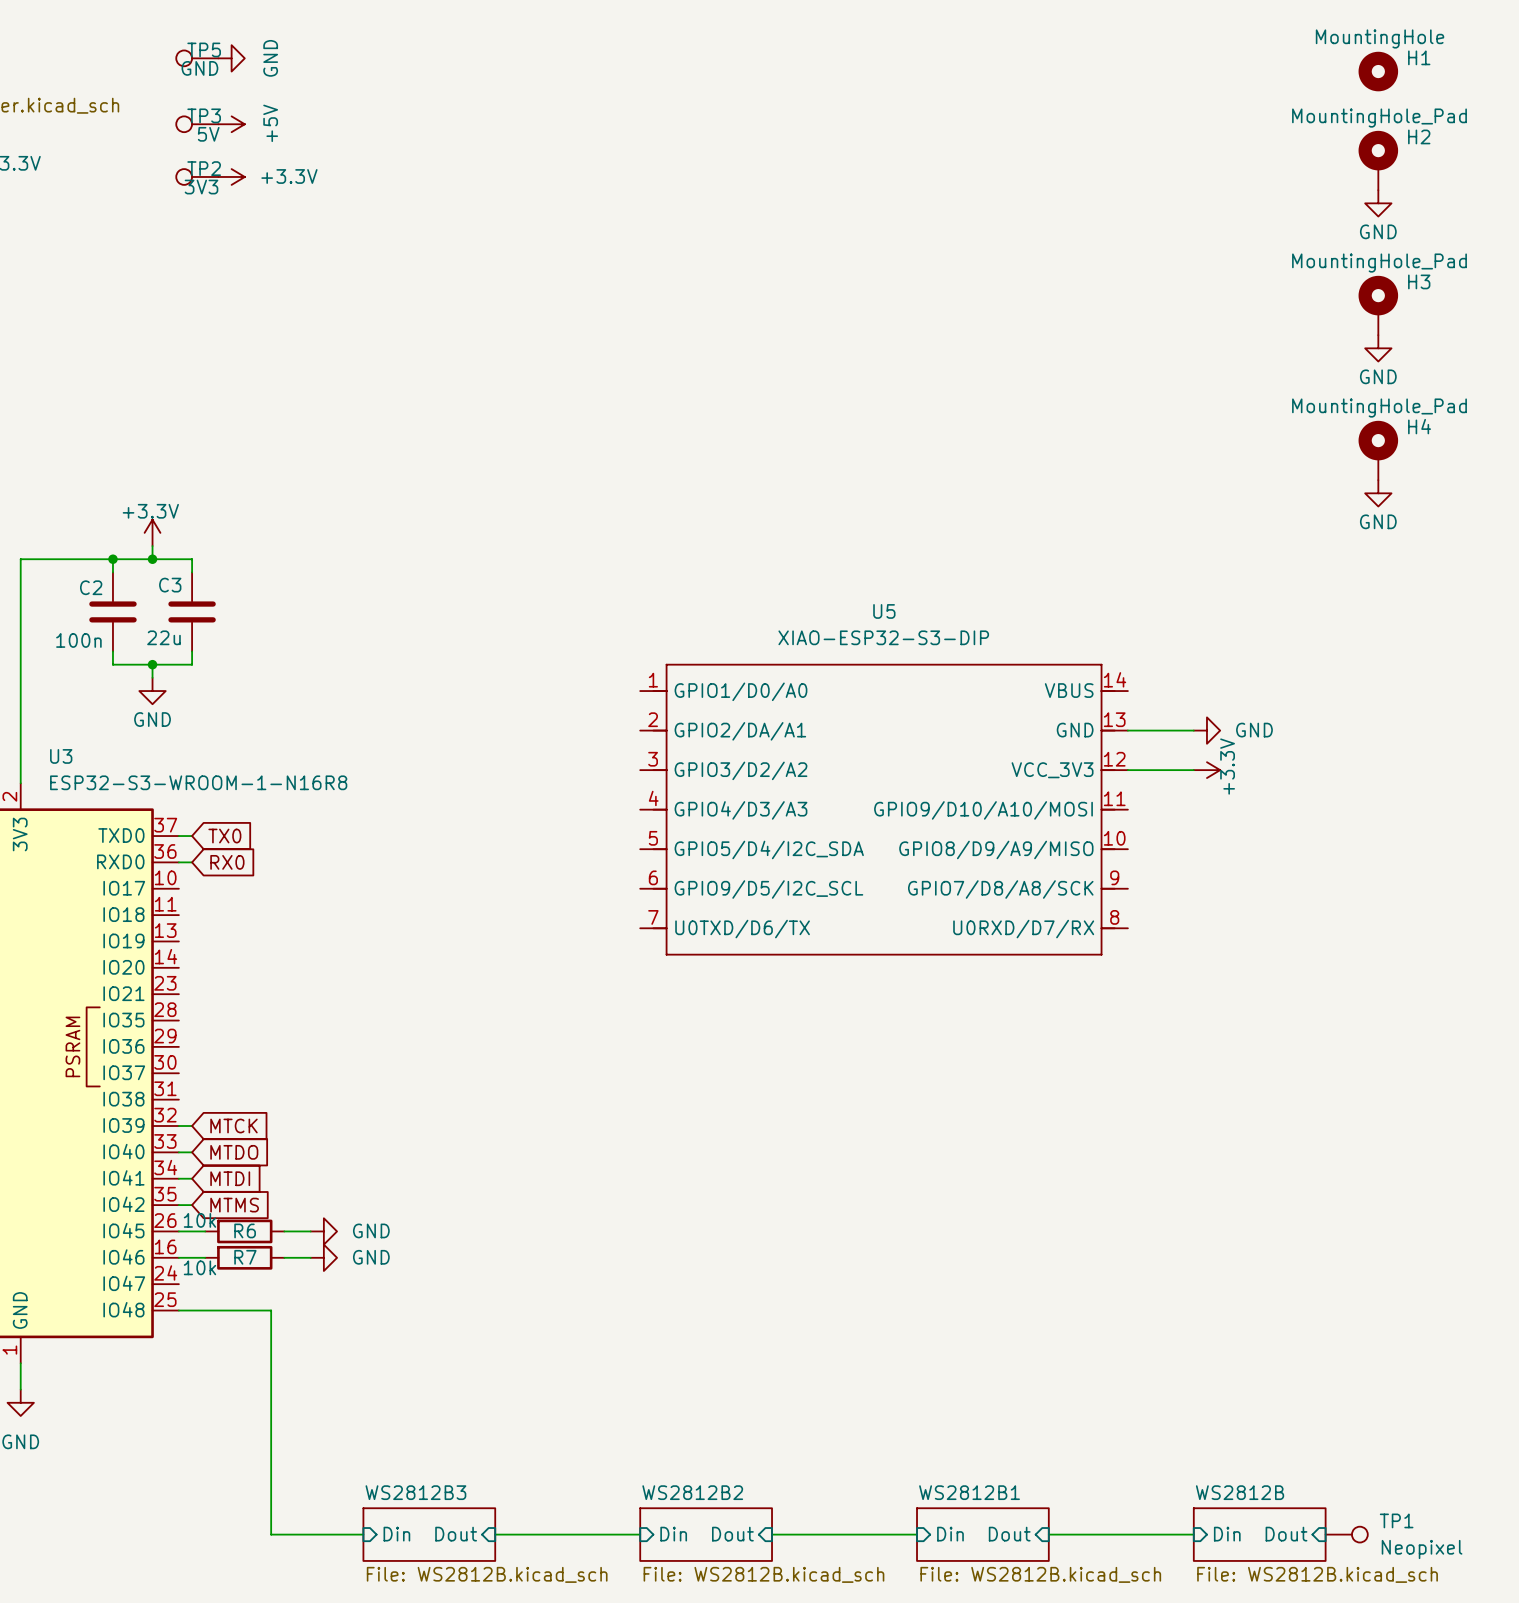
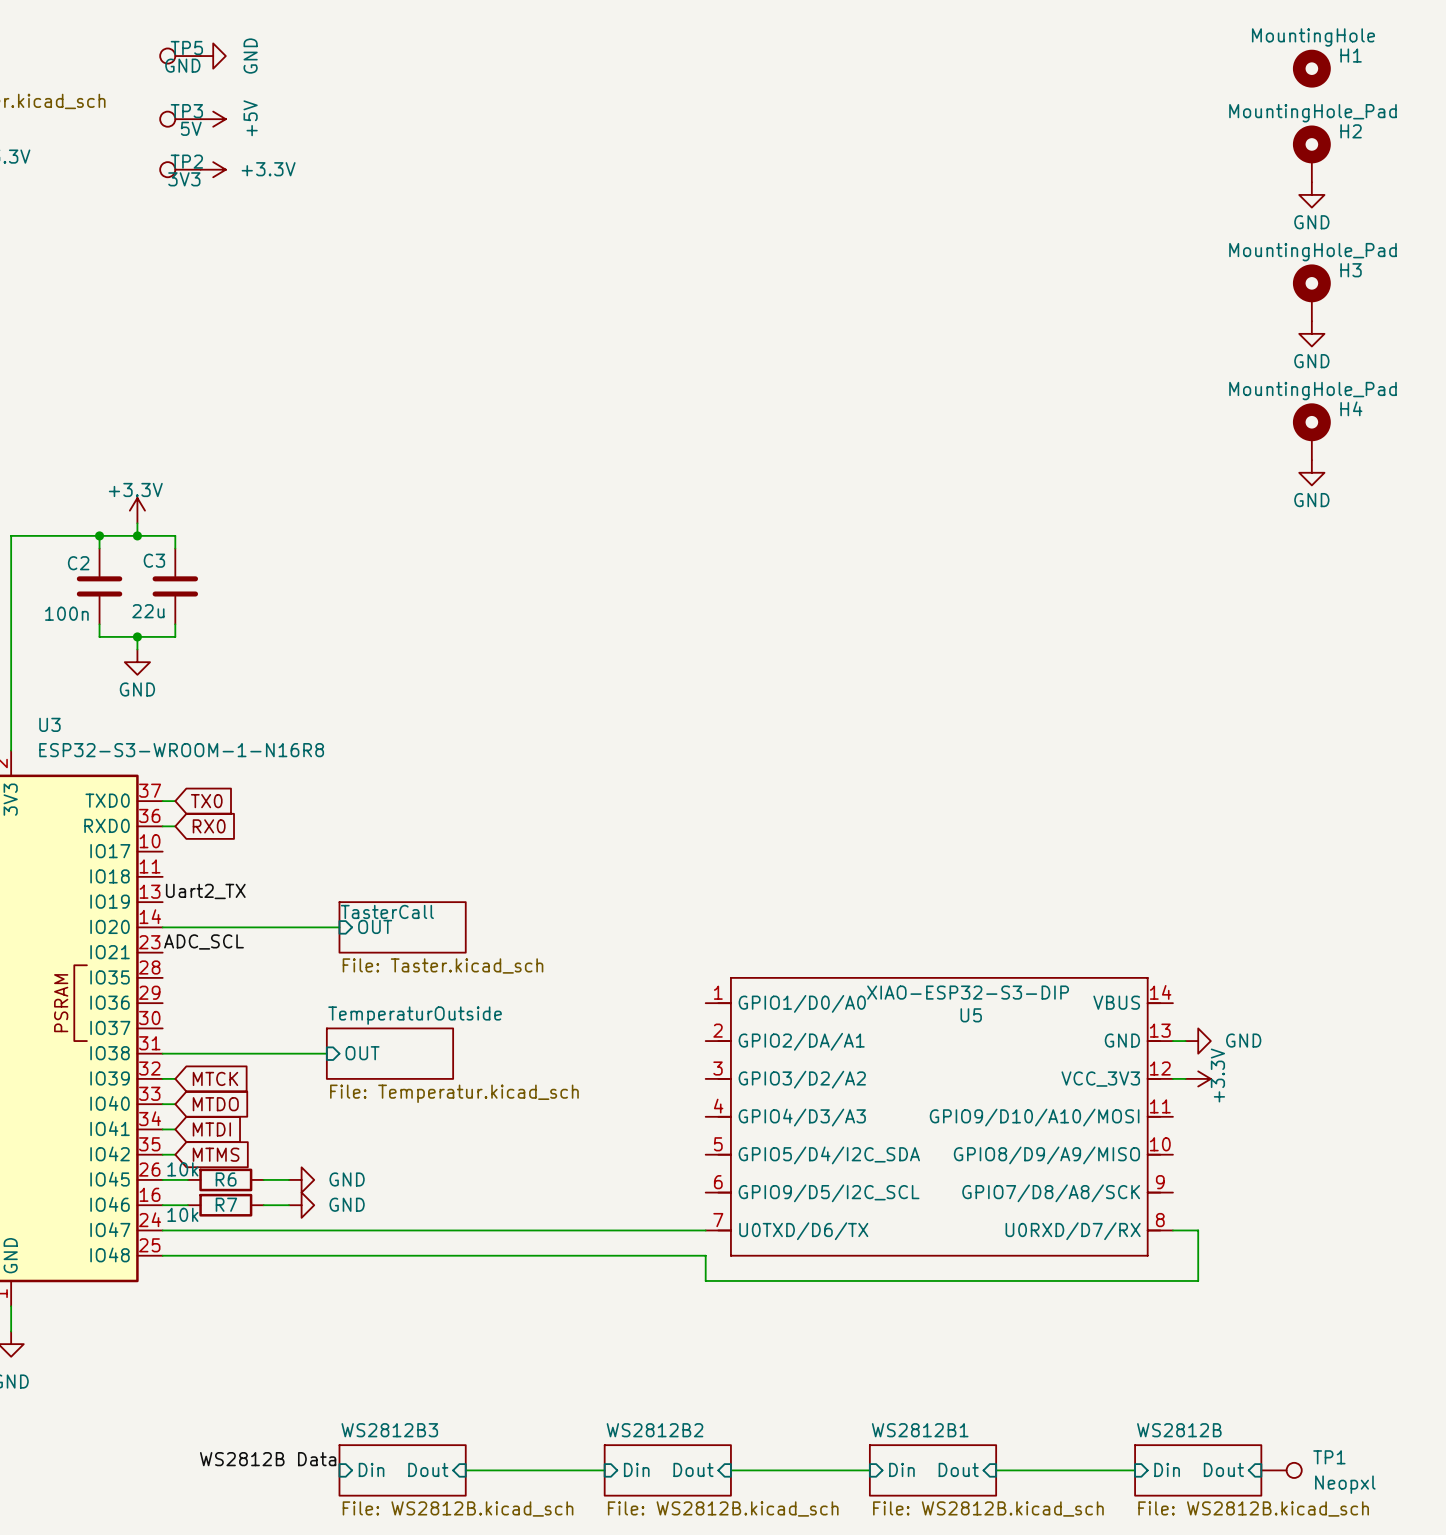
U5 name position: U5 (884, 611) -> U5 (971, 1015)
U5 value position: XIAO-ESP32-S3-DIP (883, 637) -> XIAO-ESP32-S3-DIP (968, 992)
wire: (1127, 730) (1193, 730) -> none
power symbol: GND (1206, 730) -> none
wire: (1127, 770) (1193, 770) -> none
power symbol: +3.3V (1206, 770) -> none
U5 position: (884, 809) -> (939, 1116)
label: none -> Uart2_TX (205, 891)
wire: none -> (162, 927) (339, 927)
sheet pin: none -> OUT (375, 926)
sheet TasterCall: none -> File: Taster.kicad_sch (402, 927)
label: none -> ADC_SCL (203, 941)
wire: none -> (1172, 1041) (1185, 1041)
power symbol: none -> GND (1198, 1041)
wire: none -> (162, 1053) (326, 1053)
sheet pin: none -> OUT (362, 1053)
sheet TemperaturOutside: none -> File: Temperatur.kicad_sch (389, 1053)
wire: none -> (1172, 1078) (1185, 1078)
power symbol: none -> +3.3V (1198, 1078)
wire: none -> (162, 1230) (705, 1230)
wire: (271, 1310) (271, 1534) (363, 1534) -> (251, 1255) (705, 1255) (705, 1280) (1198, 1280) (1198, 1230) (1172, 1230)
label: none -> WS2812B Data (268, 1459)
TP1 value: Neopixel (1422, 1549) -> Neopxl (1345, 1484)

